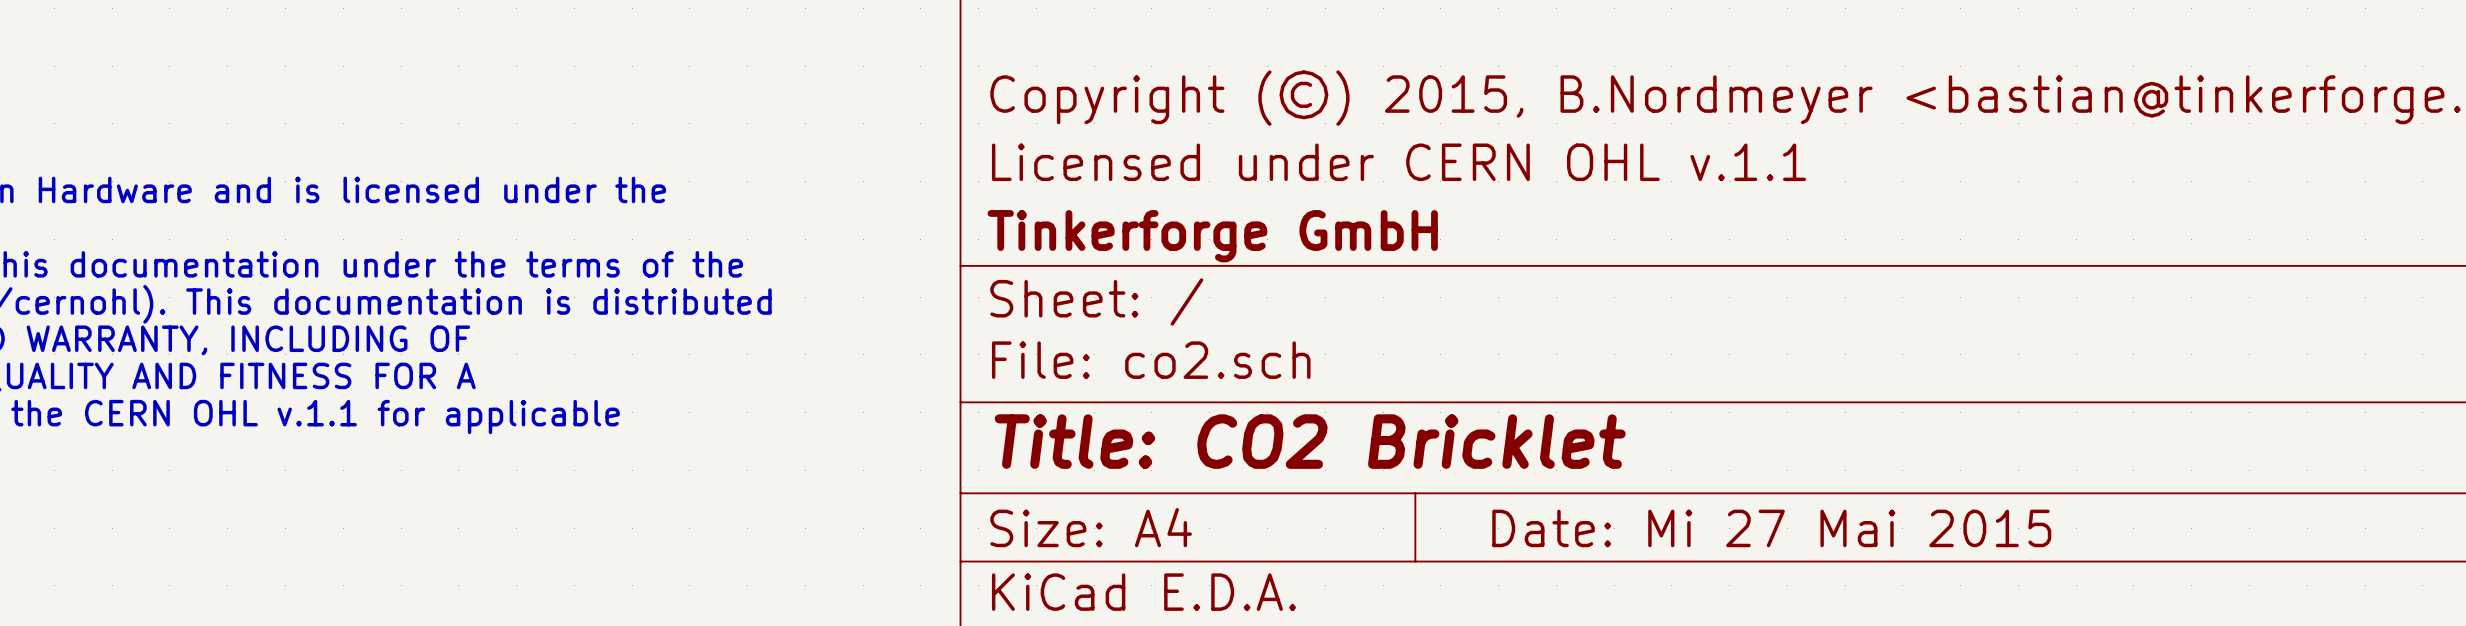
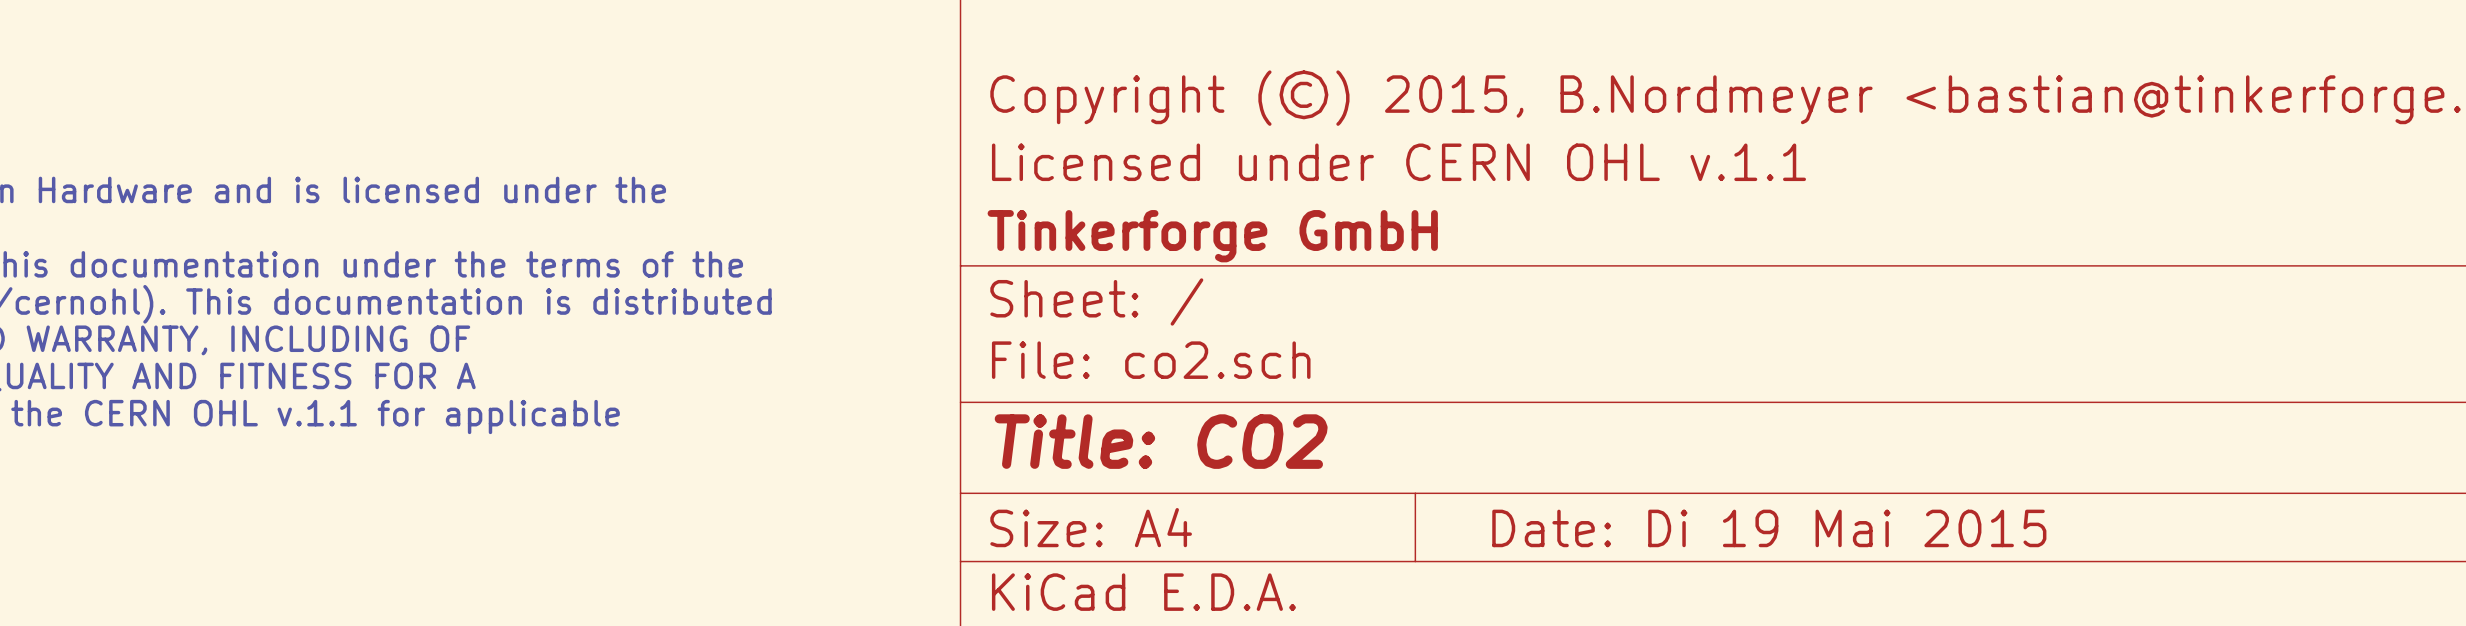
title block: Title: CO2 Bricklet (1310, 441) -> Title: CO2 (1161, 441)
title block: Date: Mi 27 Mai 2015 (1771, 528) -> Date: Di 19 Mai 2015 (1769, 528)

